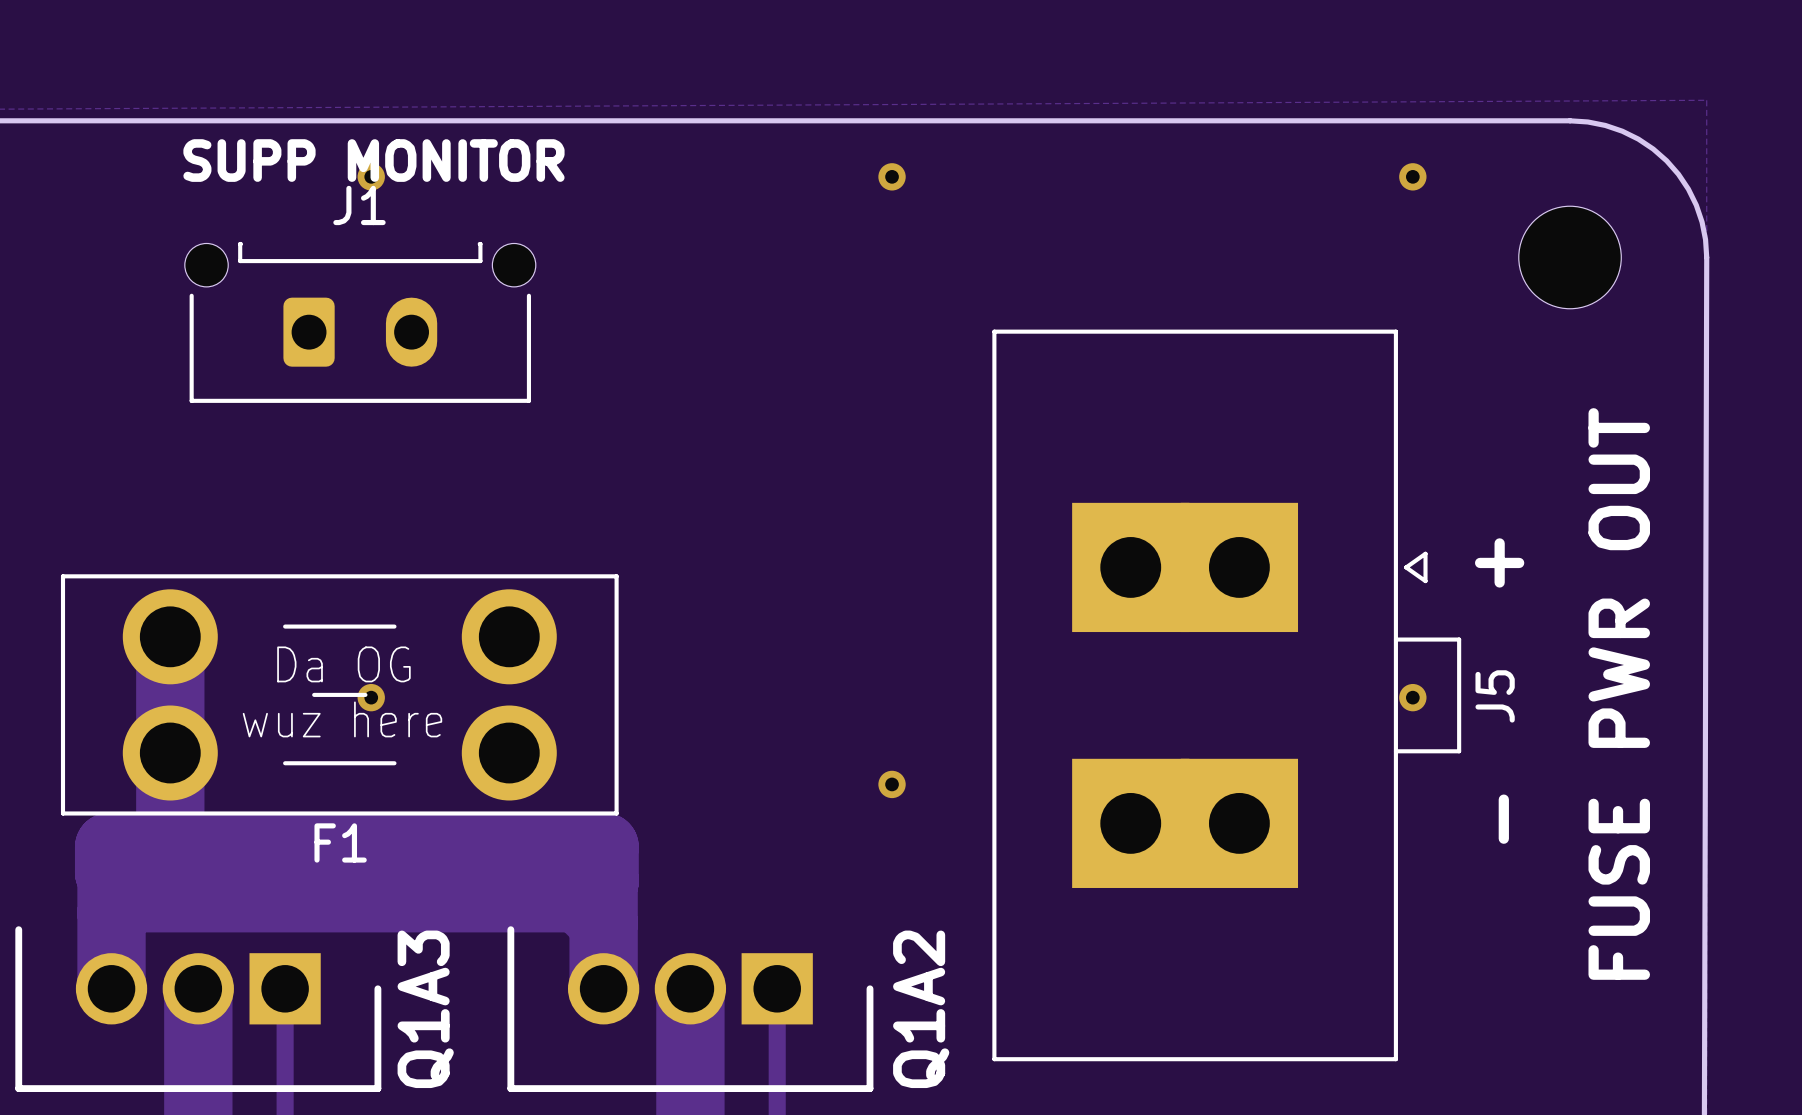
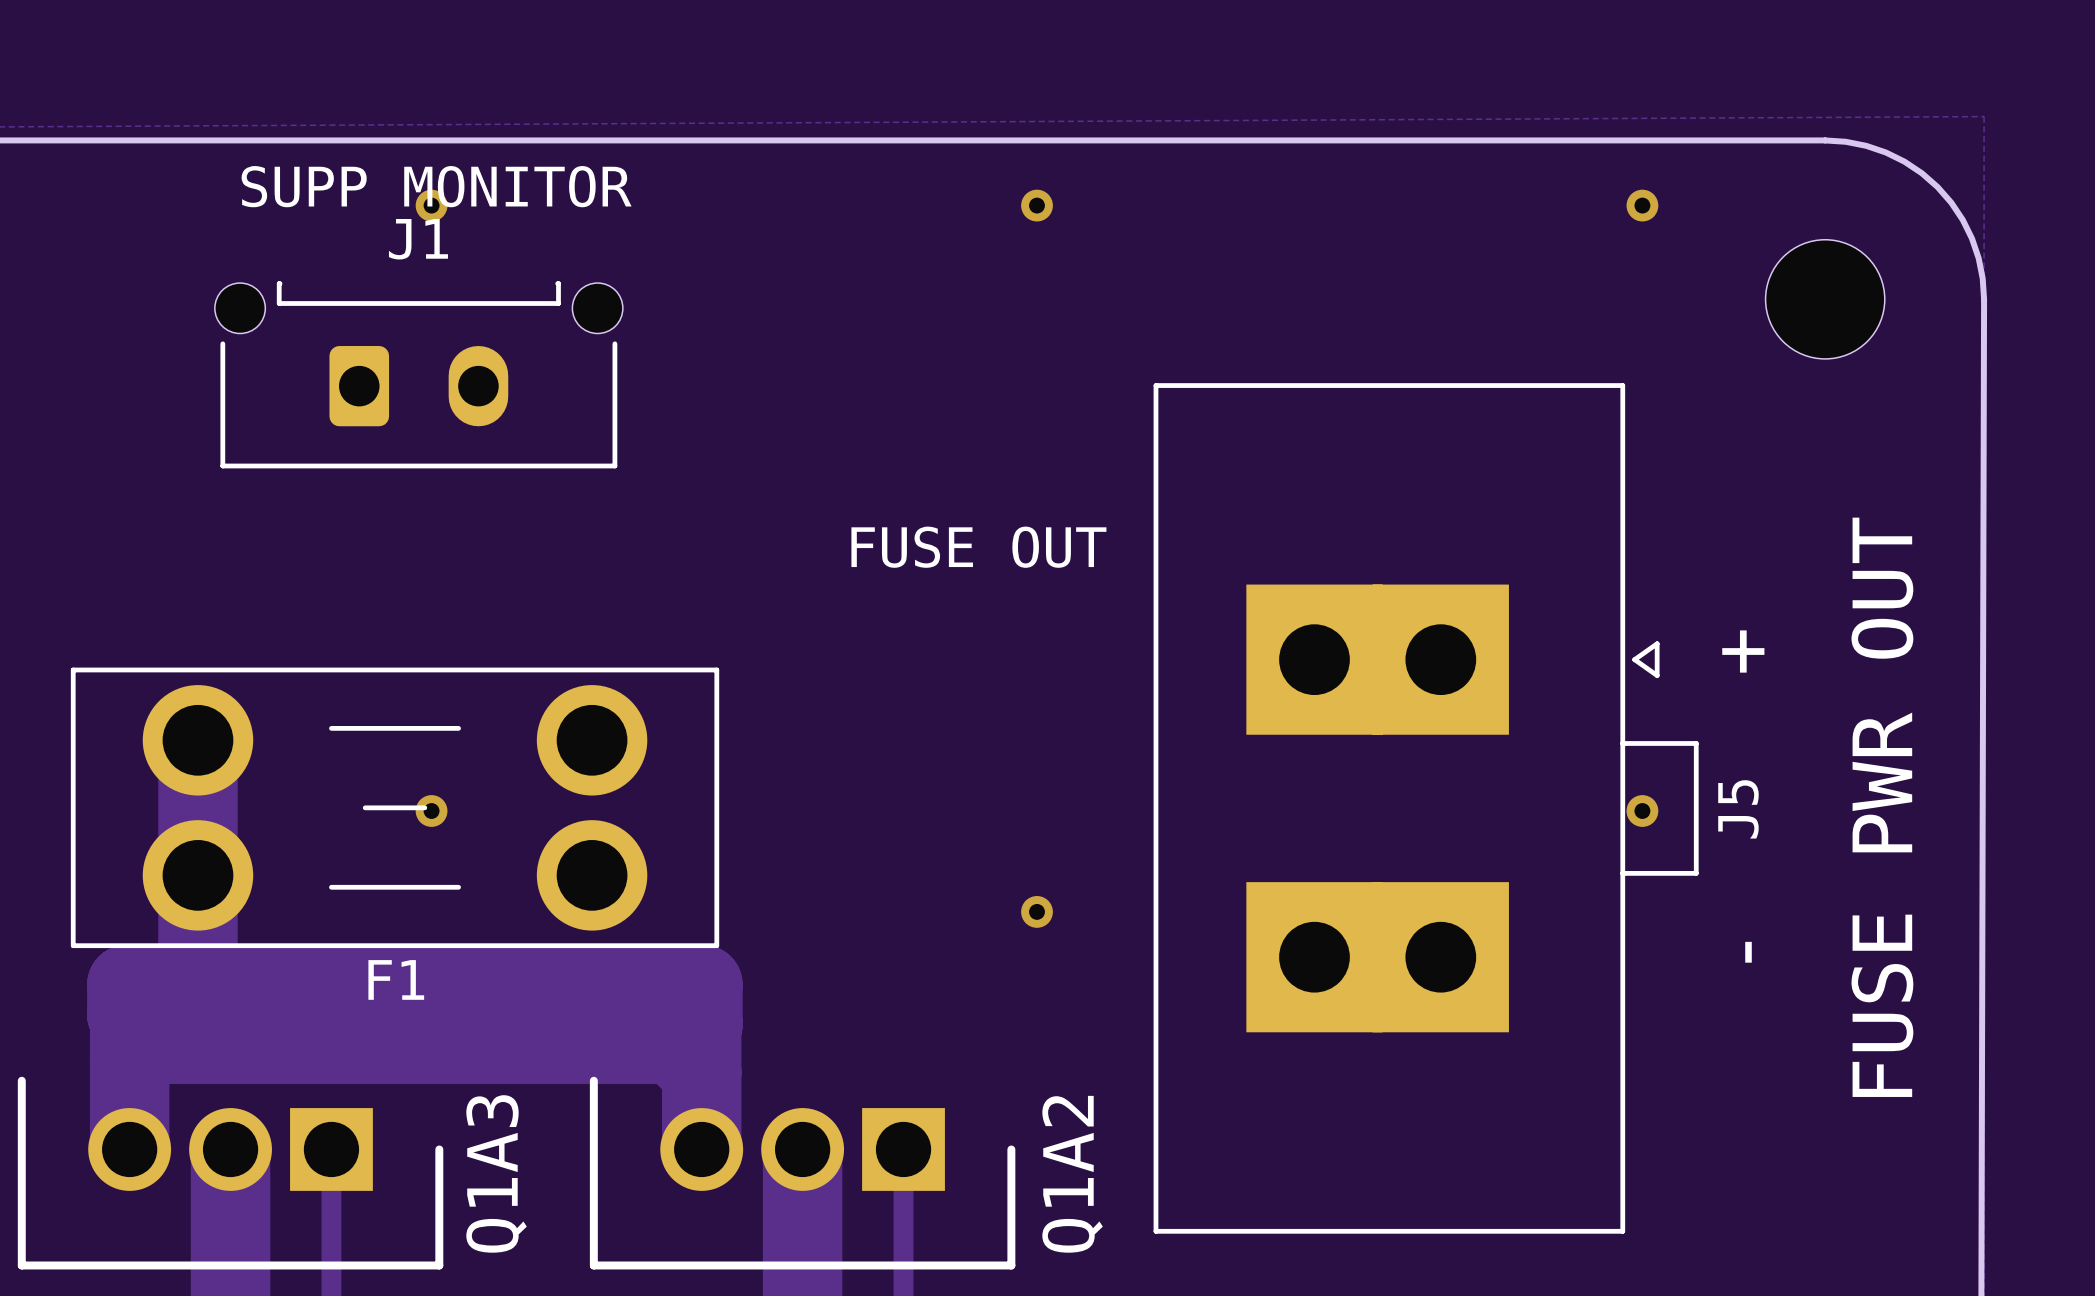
text: none -> FUSE OUT (978, 547)
text: Da OG (343, 664) -> none
text: wuz here (342, 719) -> none

